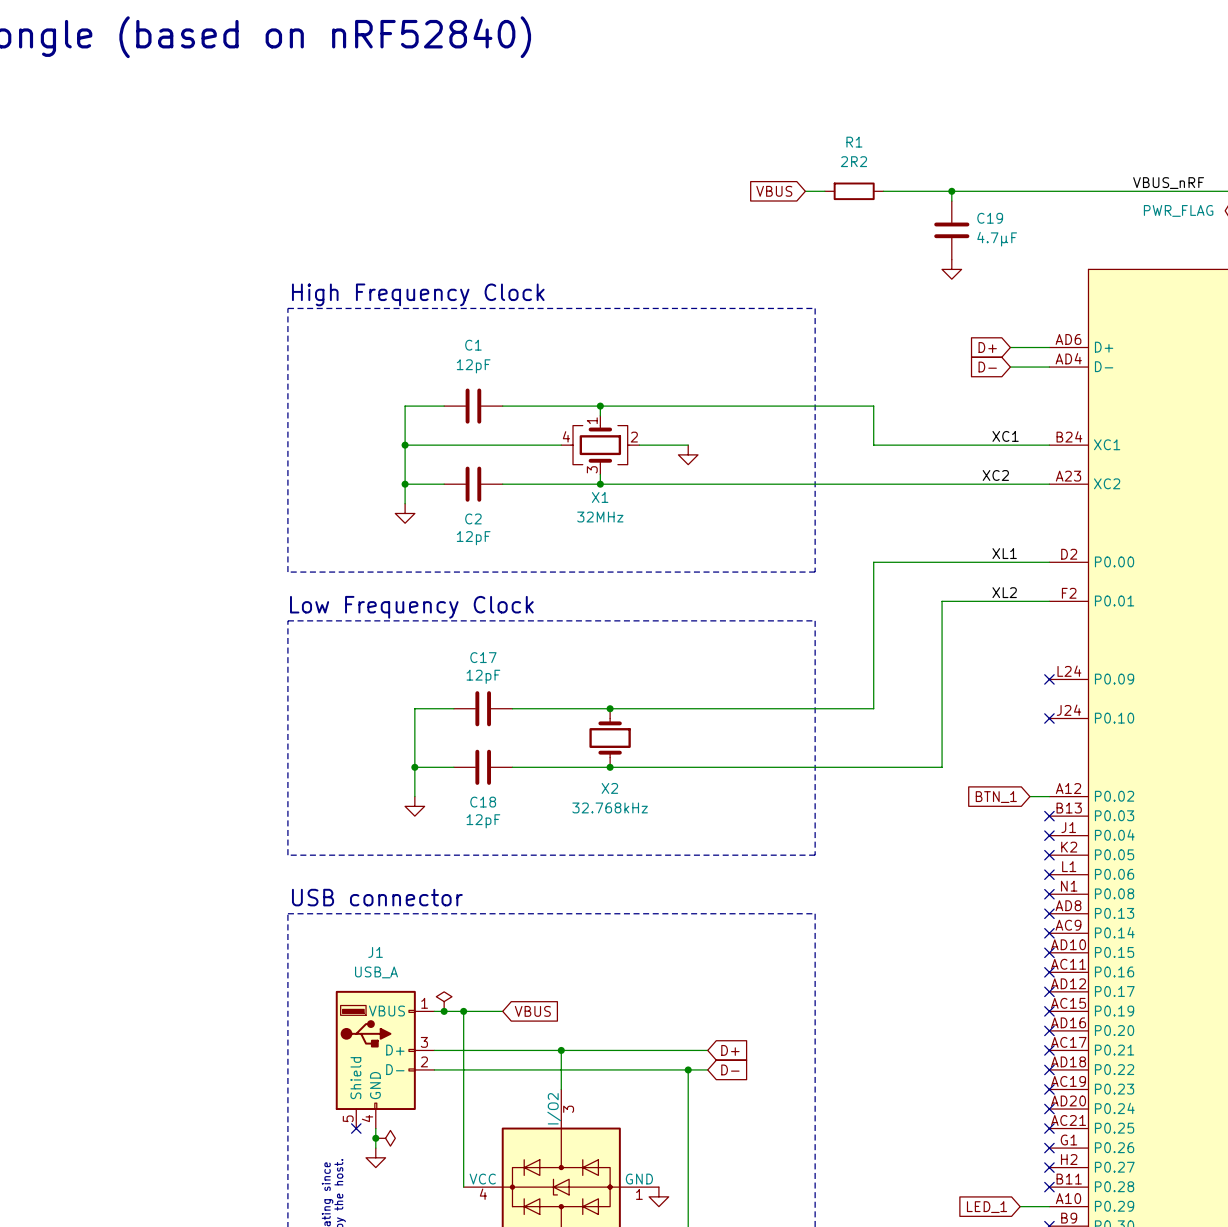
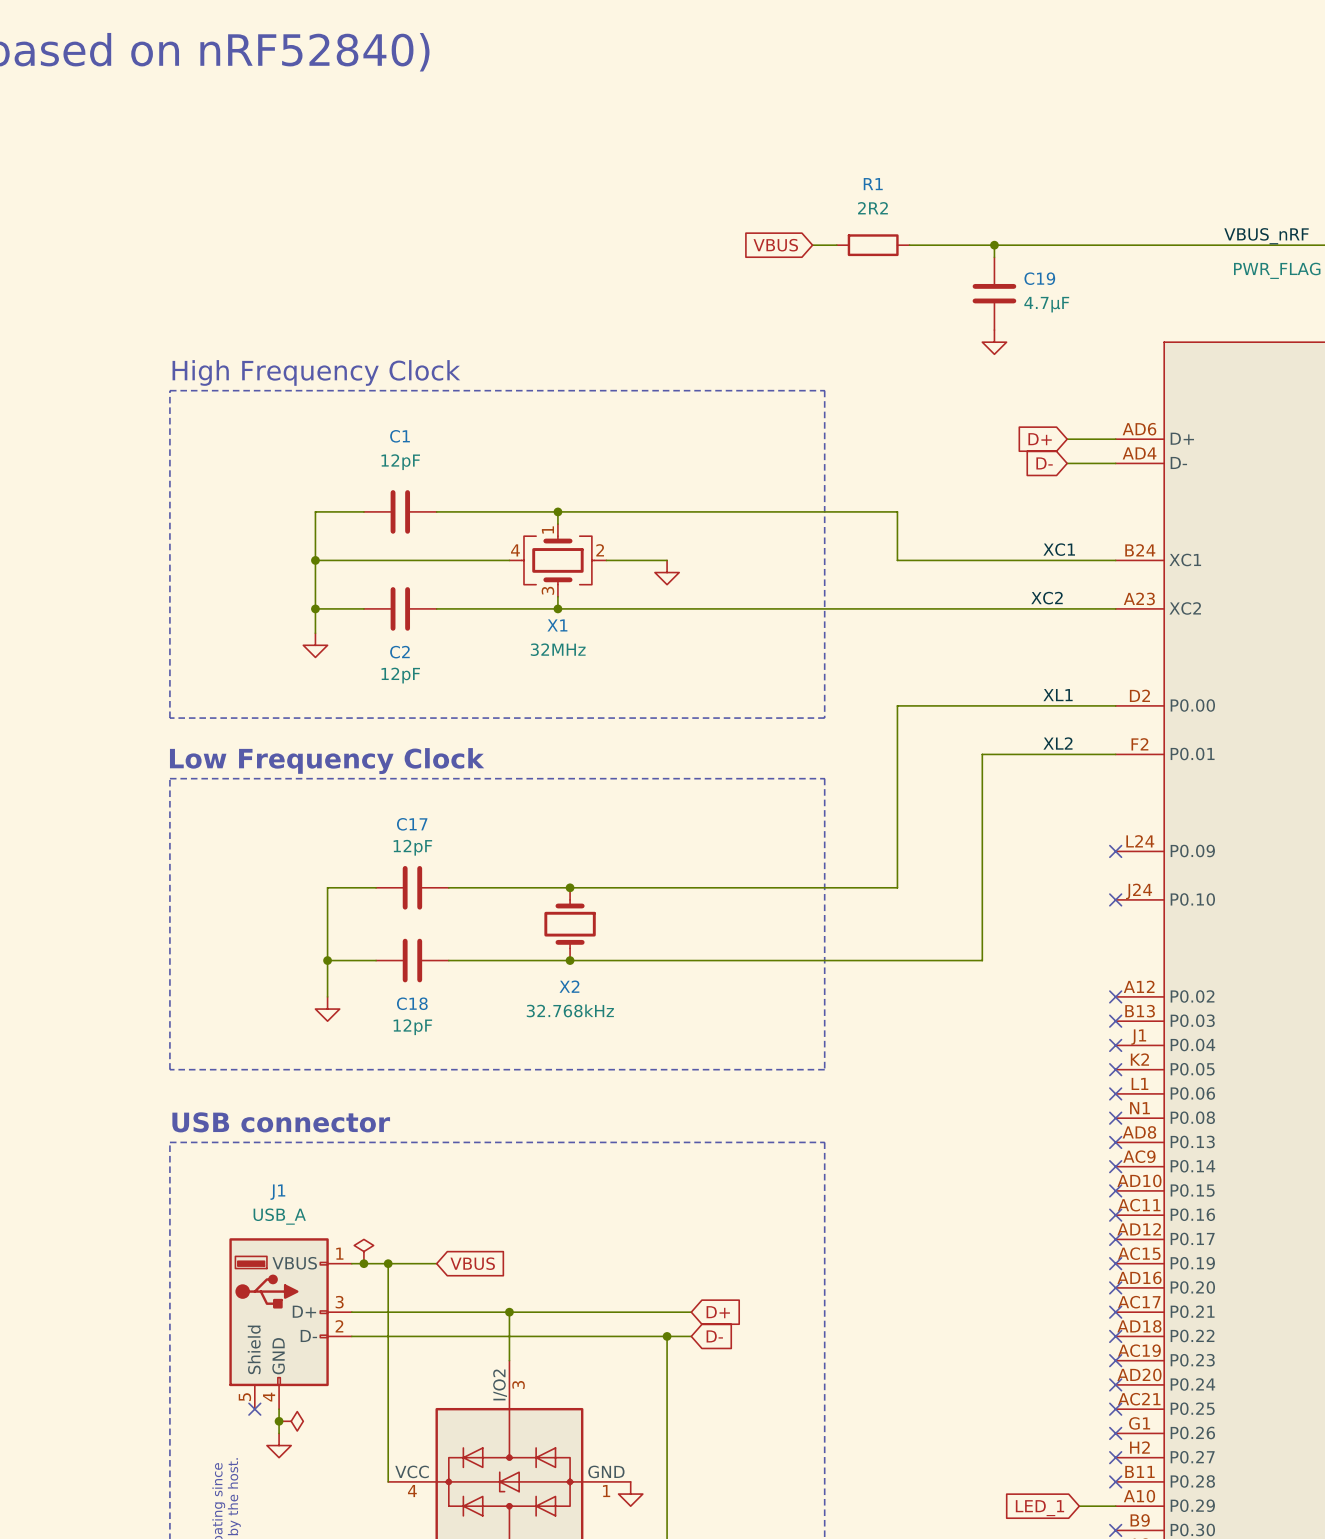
wire: (1029, 796) (1049, 796) -> none
no-connect mark: none -> (1115, 996)
global label: BTN_1 (996, 797) -> none

